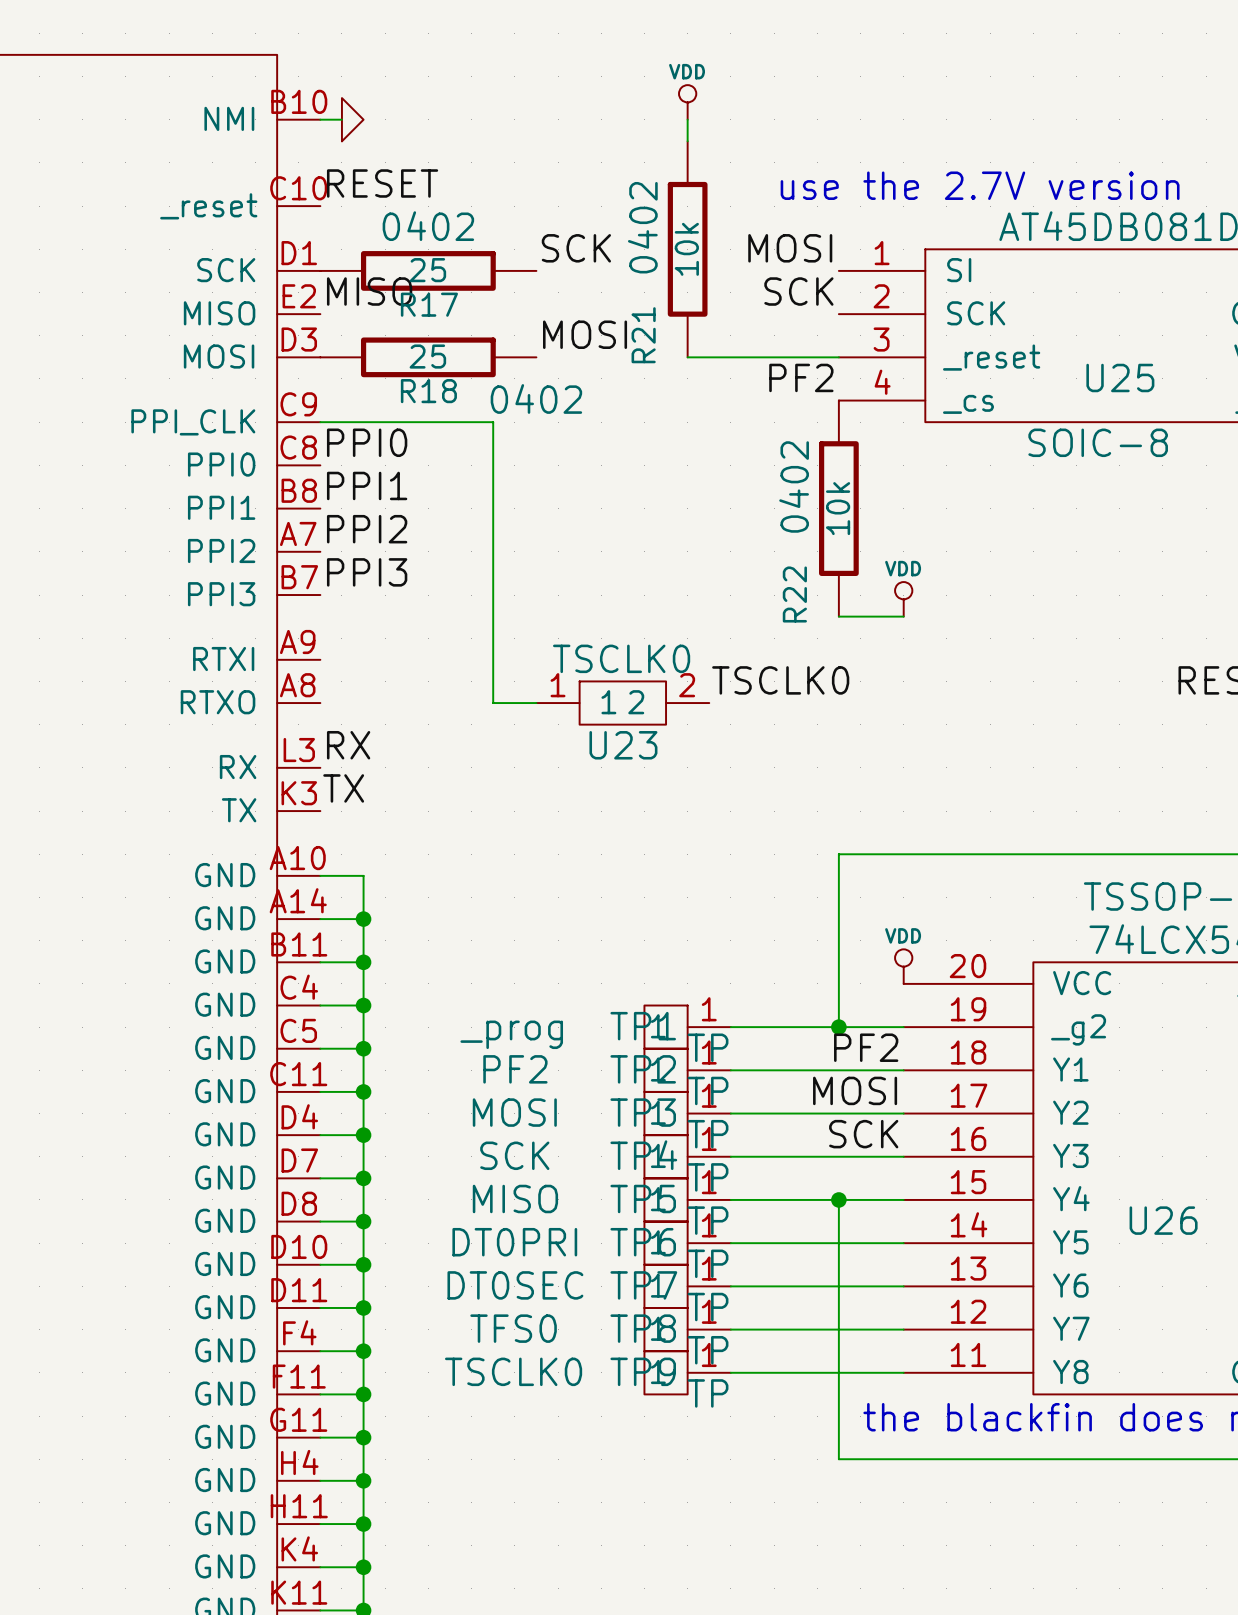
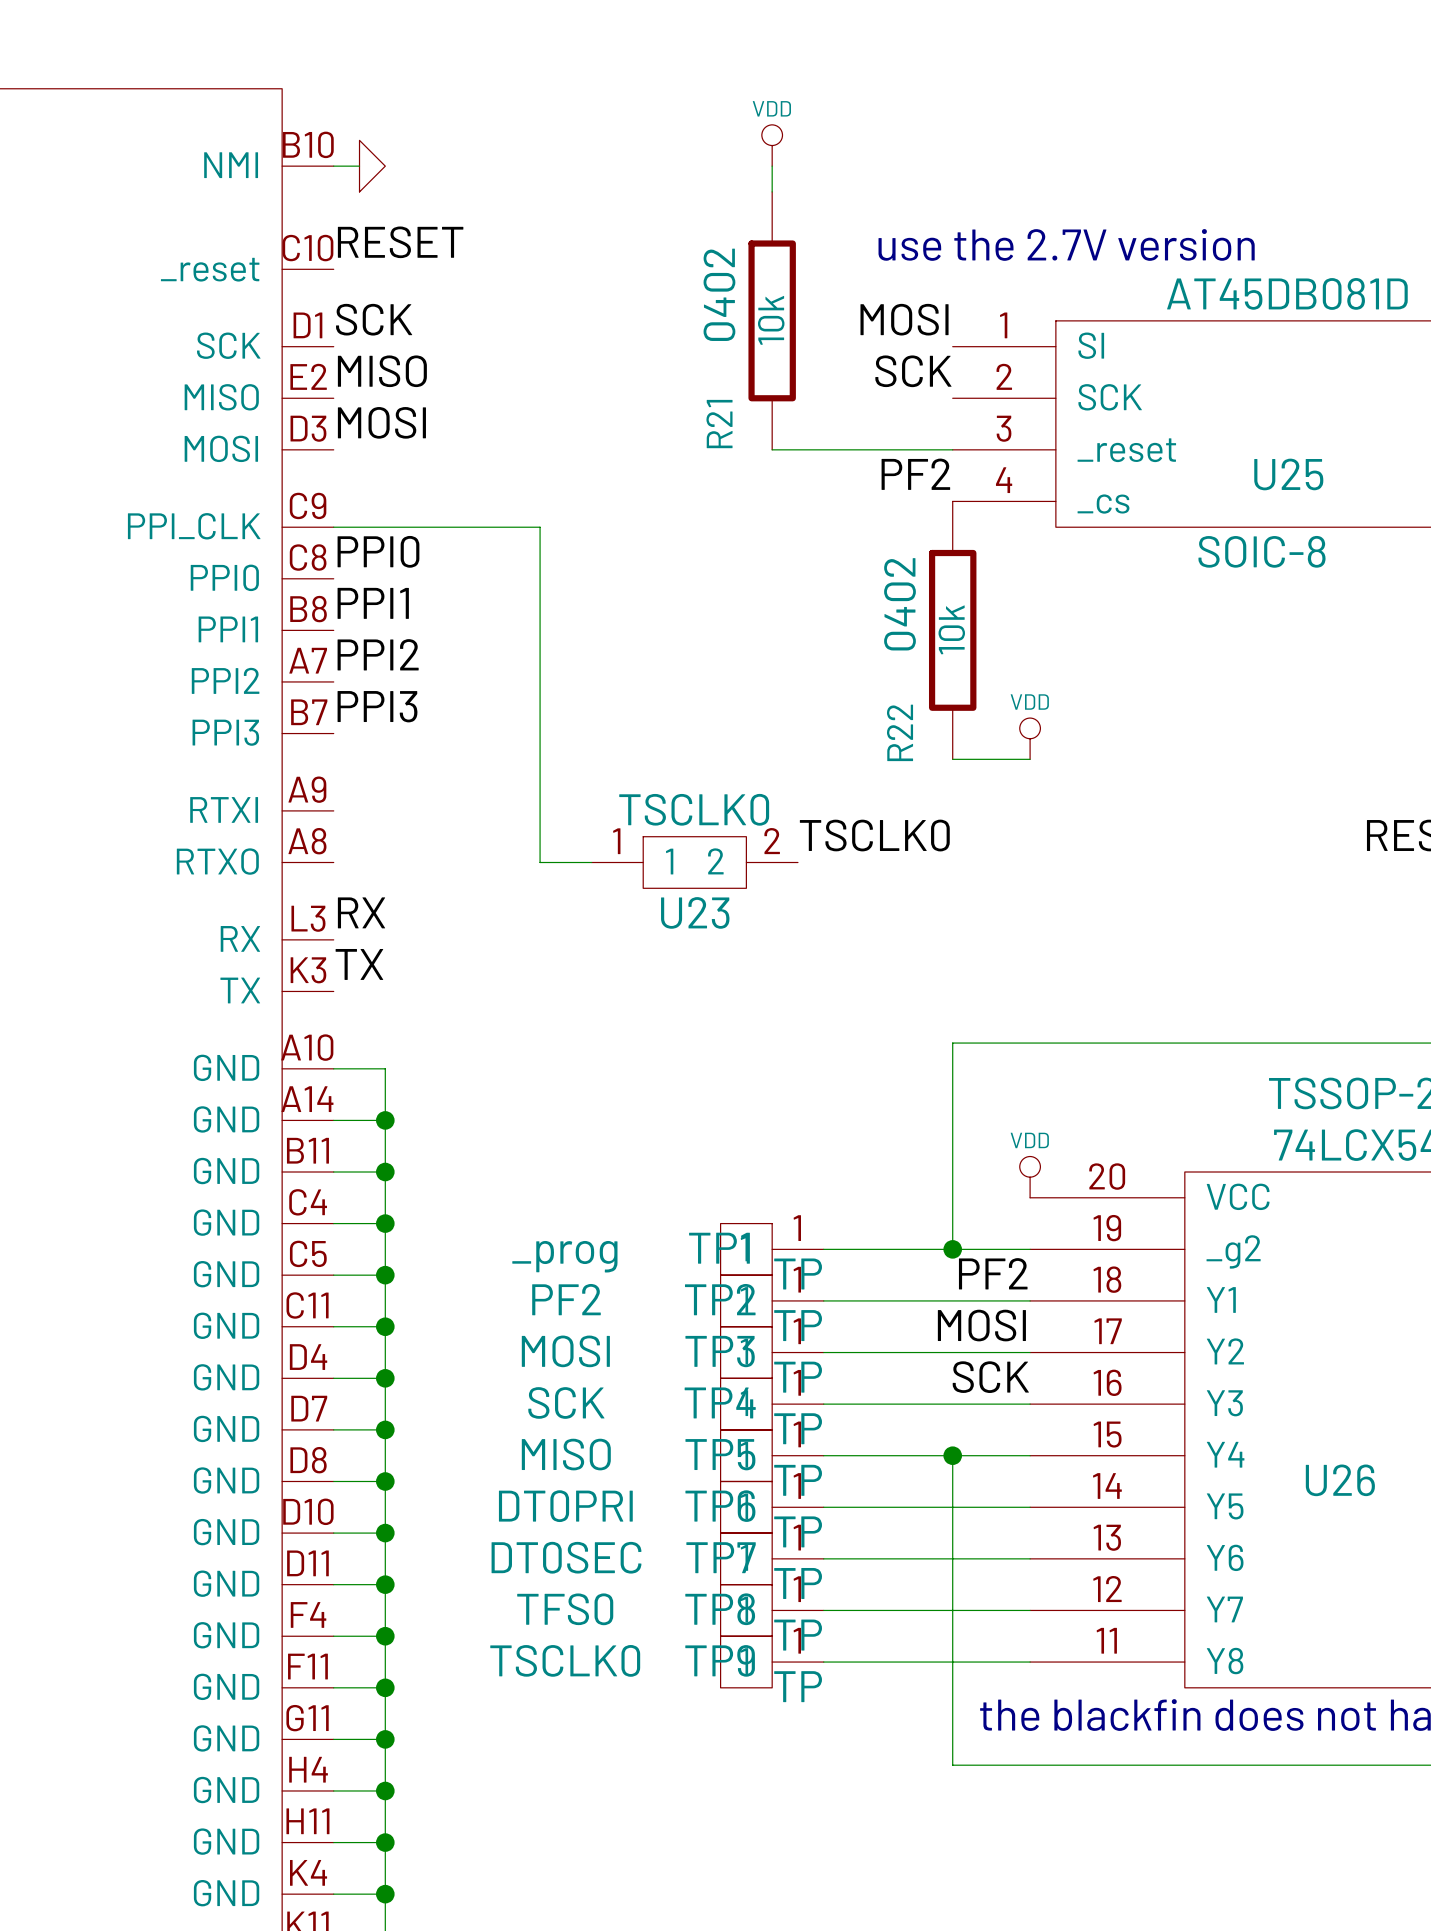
label position: SCK (576, 248) -> SCK (374, 319)
R17: 25 (428, 270) -> none
label position: MOSI (585, 334) -> MOSI (381, 422)
R18: 25 (428, 357) -> none

